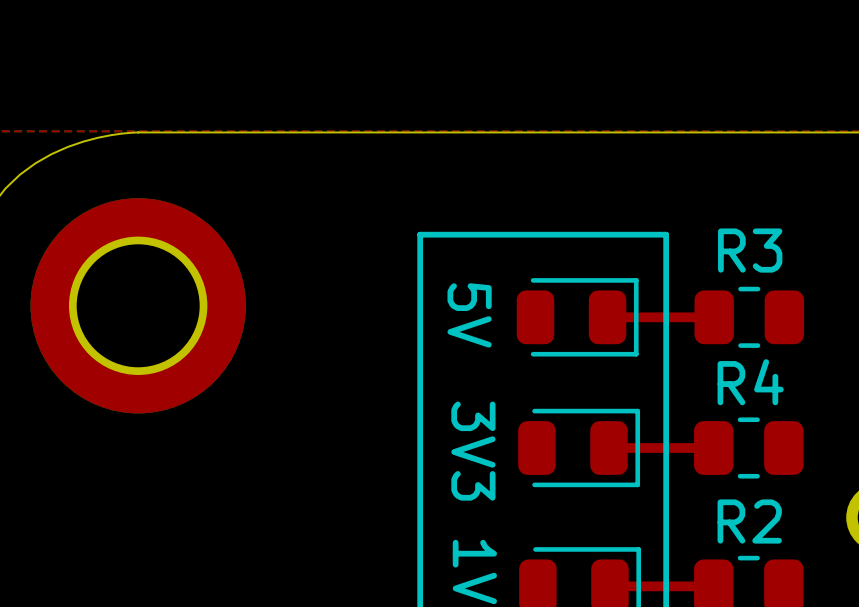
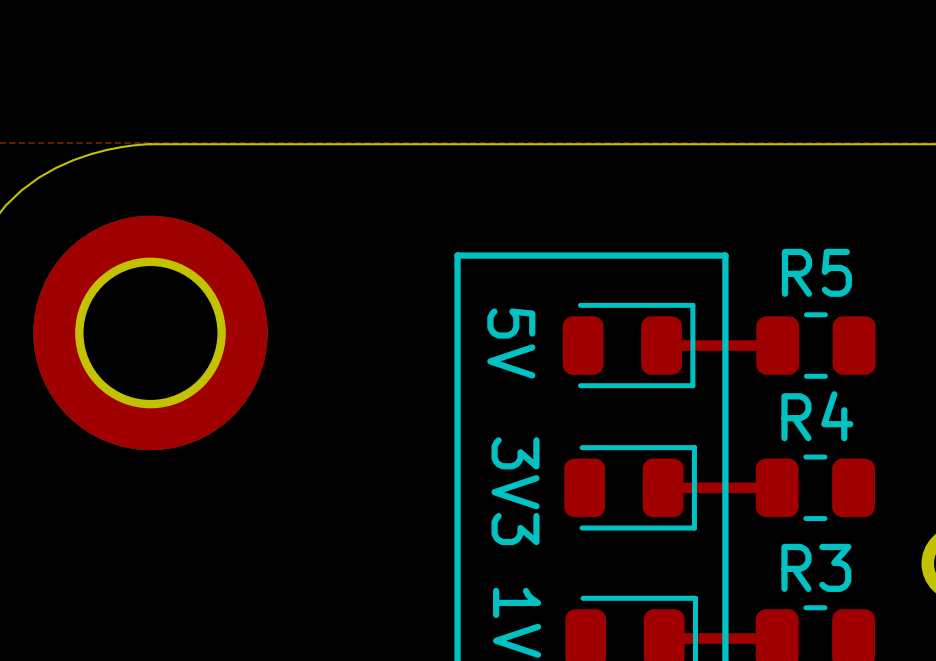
R3 name: R3 (750, 250) -> R5 (816, 272)
R2 name: R2 (749, 521) -> R3 (816, 567)

